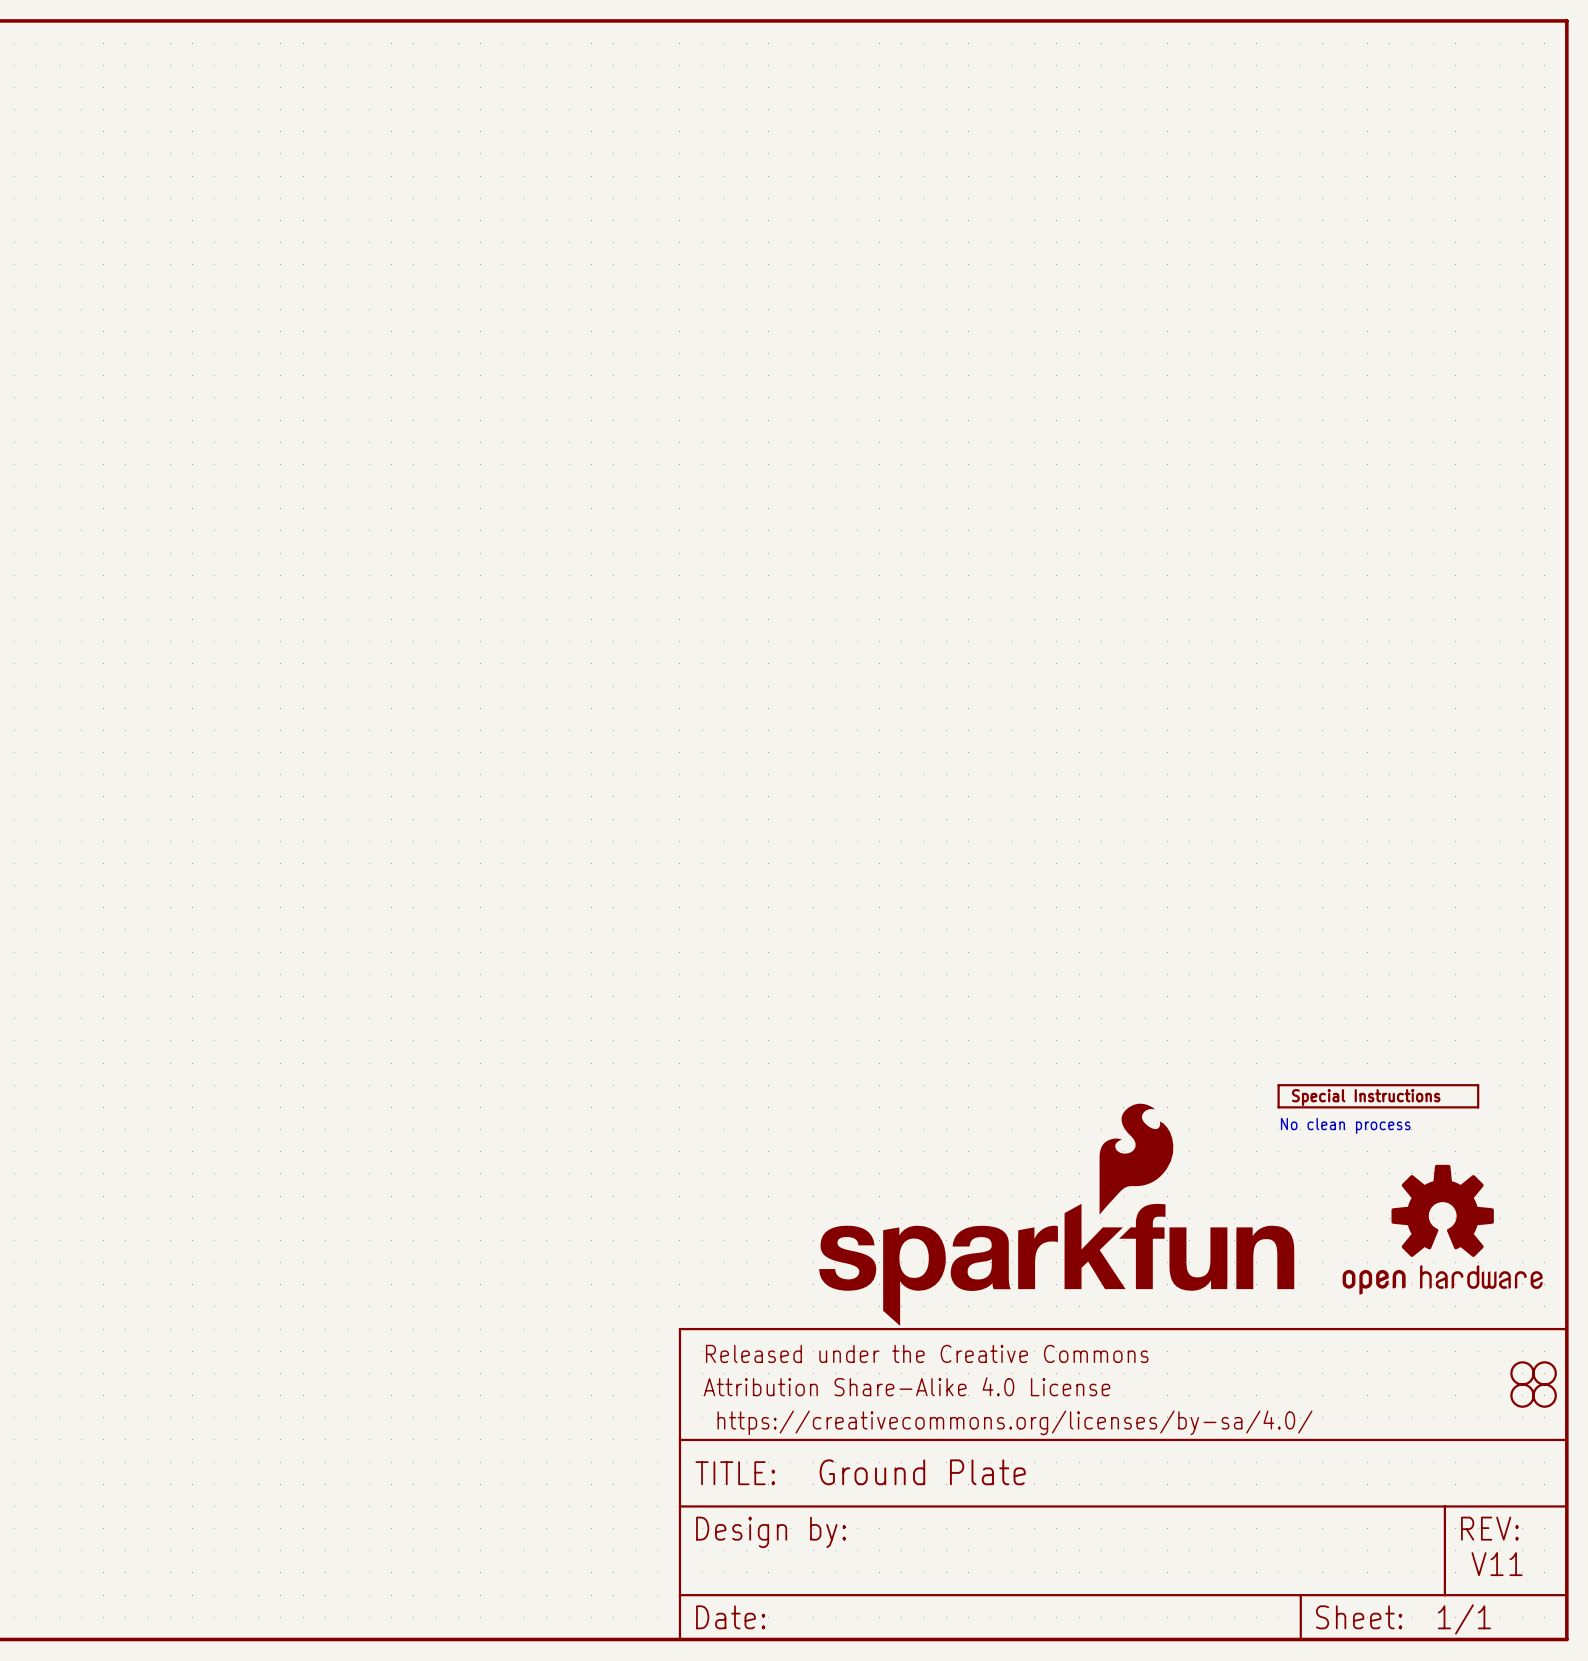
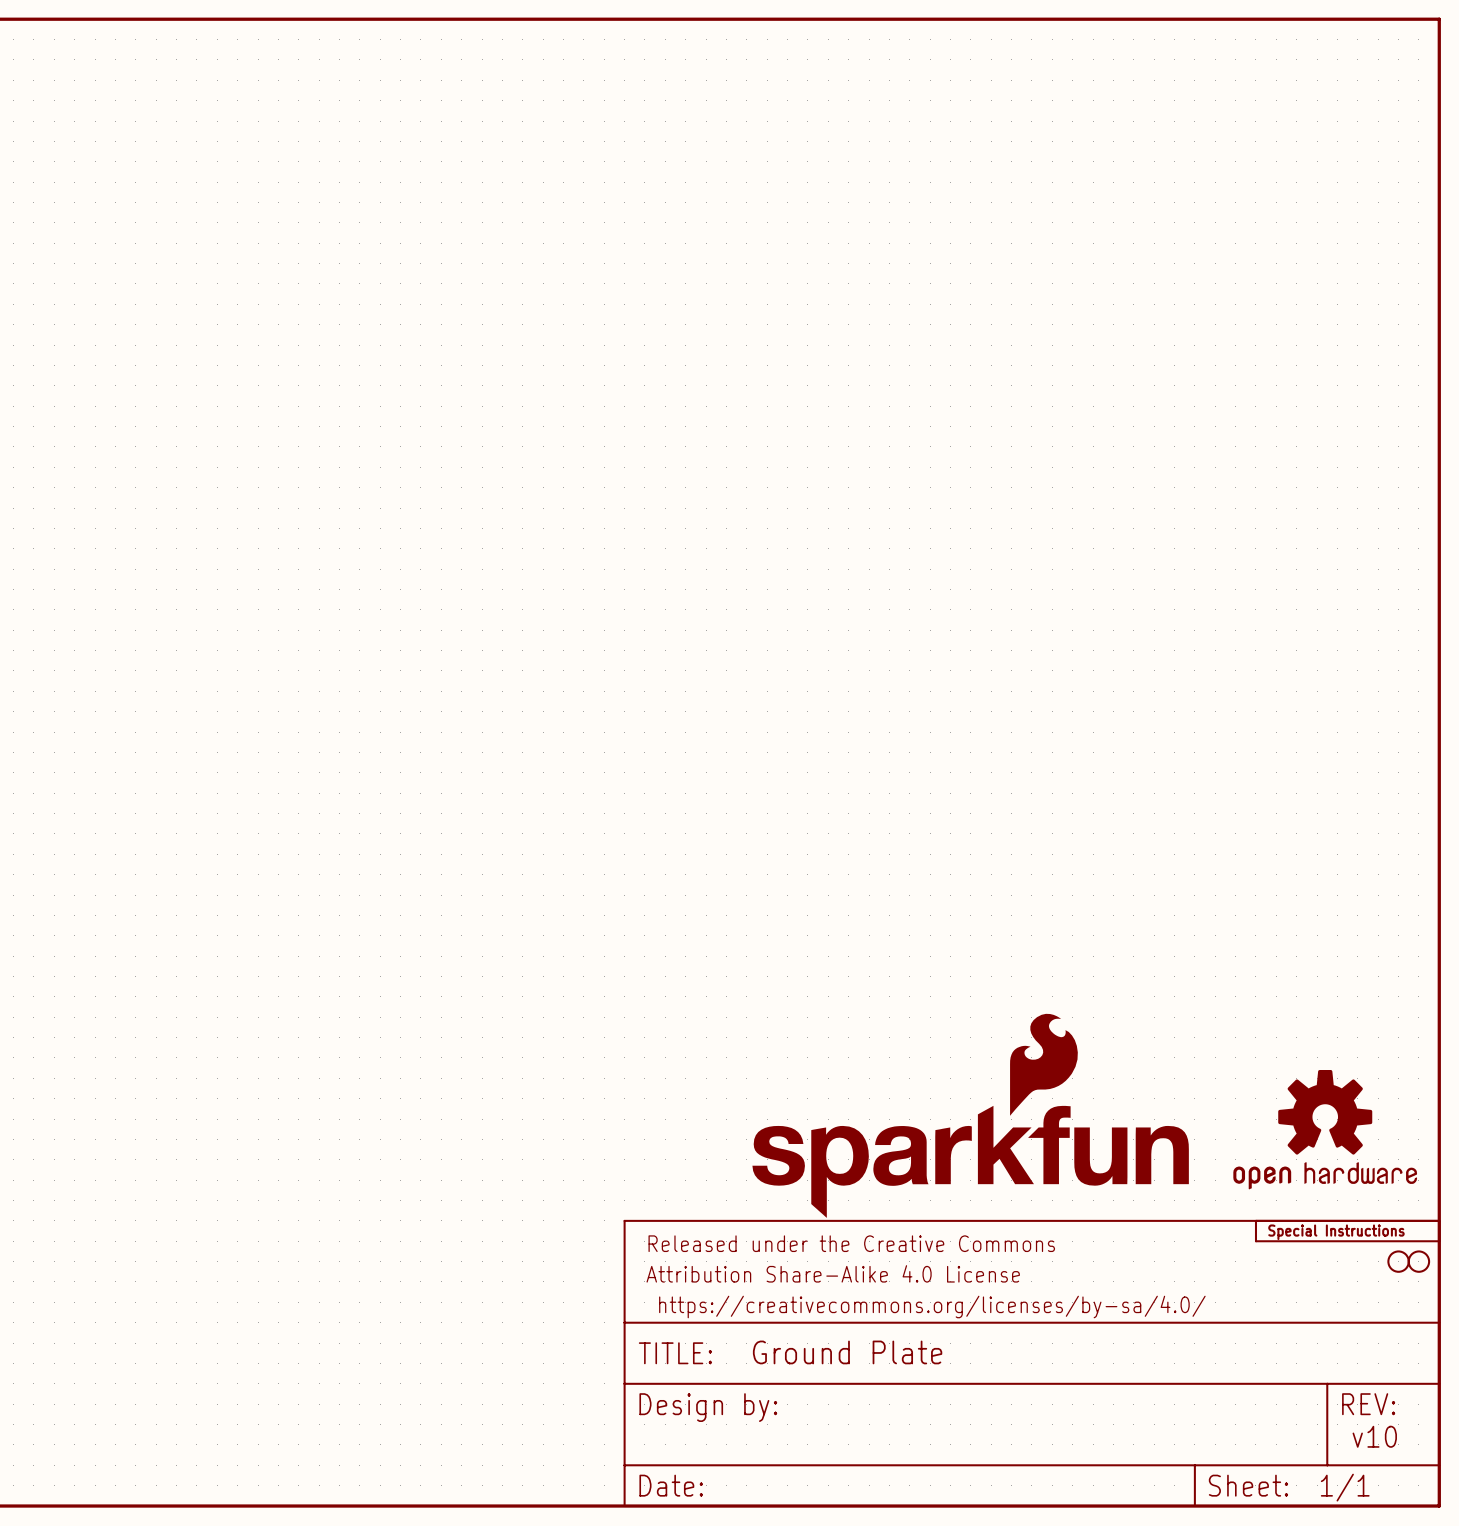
part: (1378, 1096) -> none
text: No clean process (1345, 1125) -> none
part: none -> (1347, 1231)
part: (1522, 1395) -> none
part: (1544, 1395) -> none
text: V11 (1497, 1564) -> v10 (1374, 1436)

